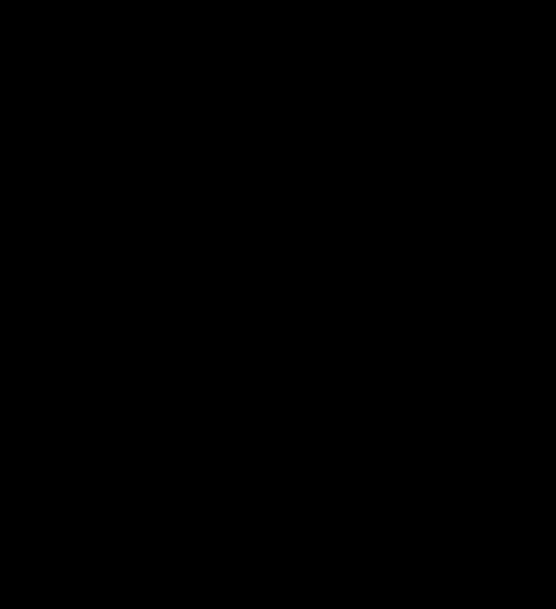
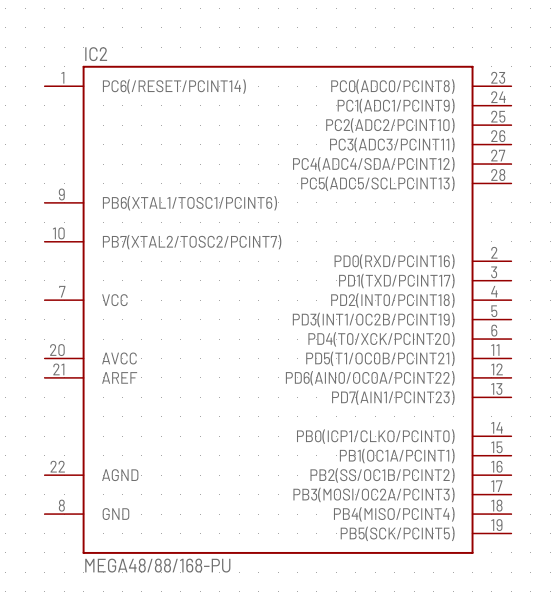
IC2: none -> MEGA48/88/168-PU (278, 309)

